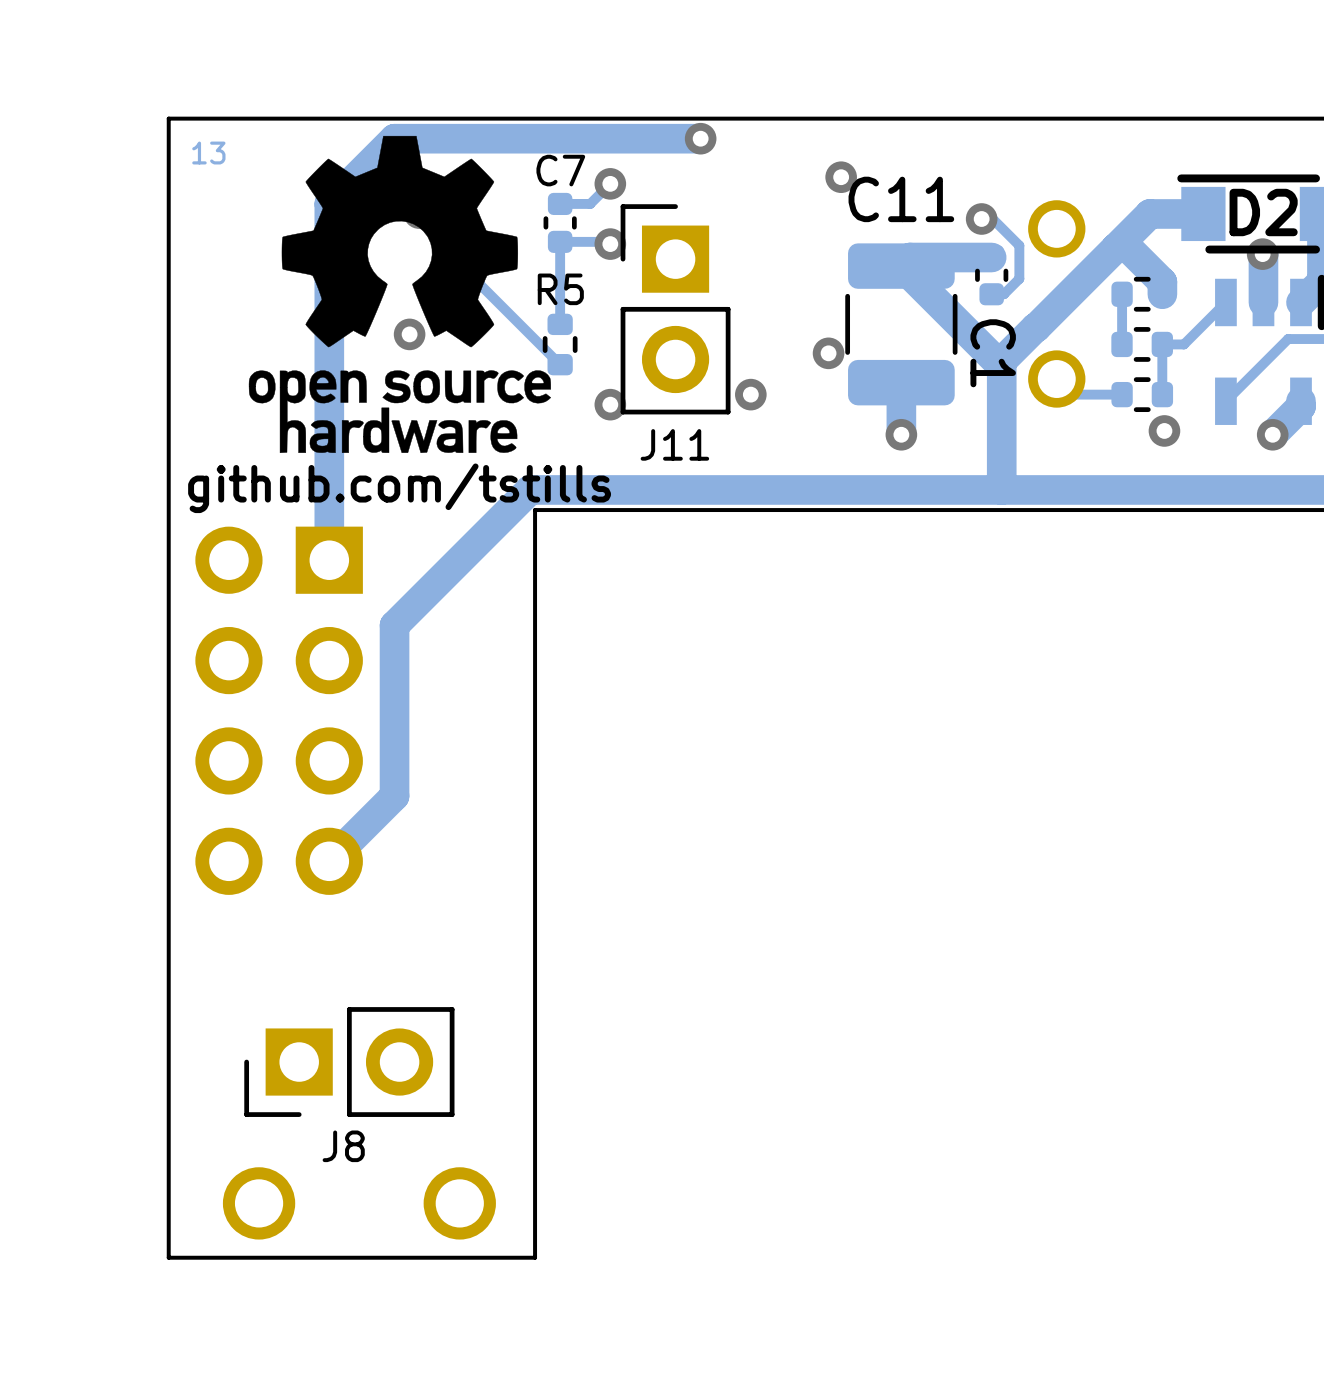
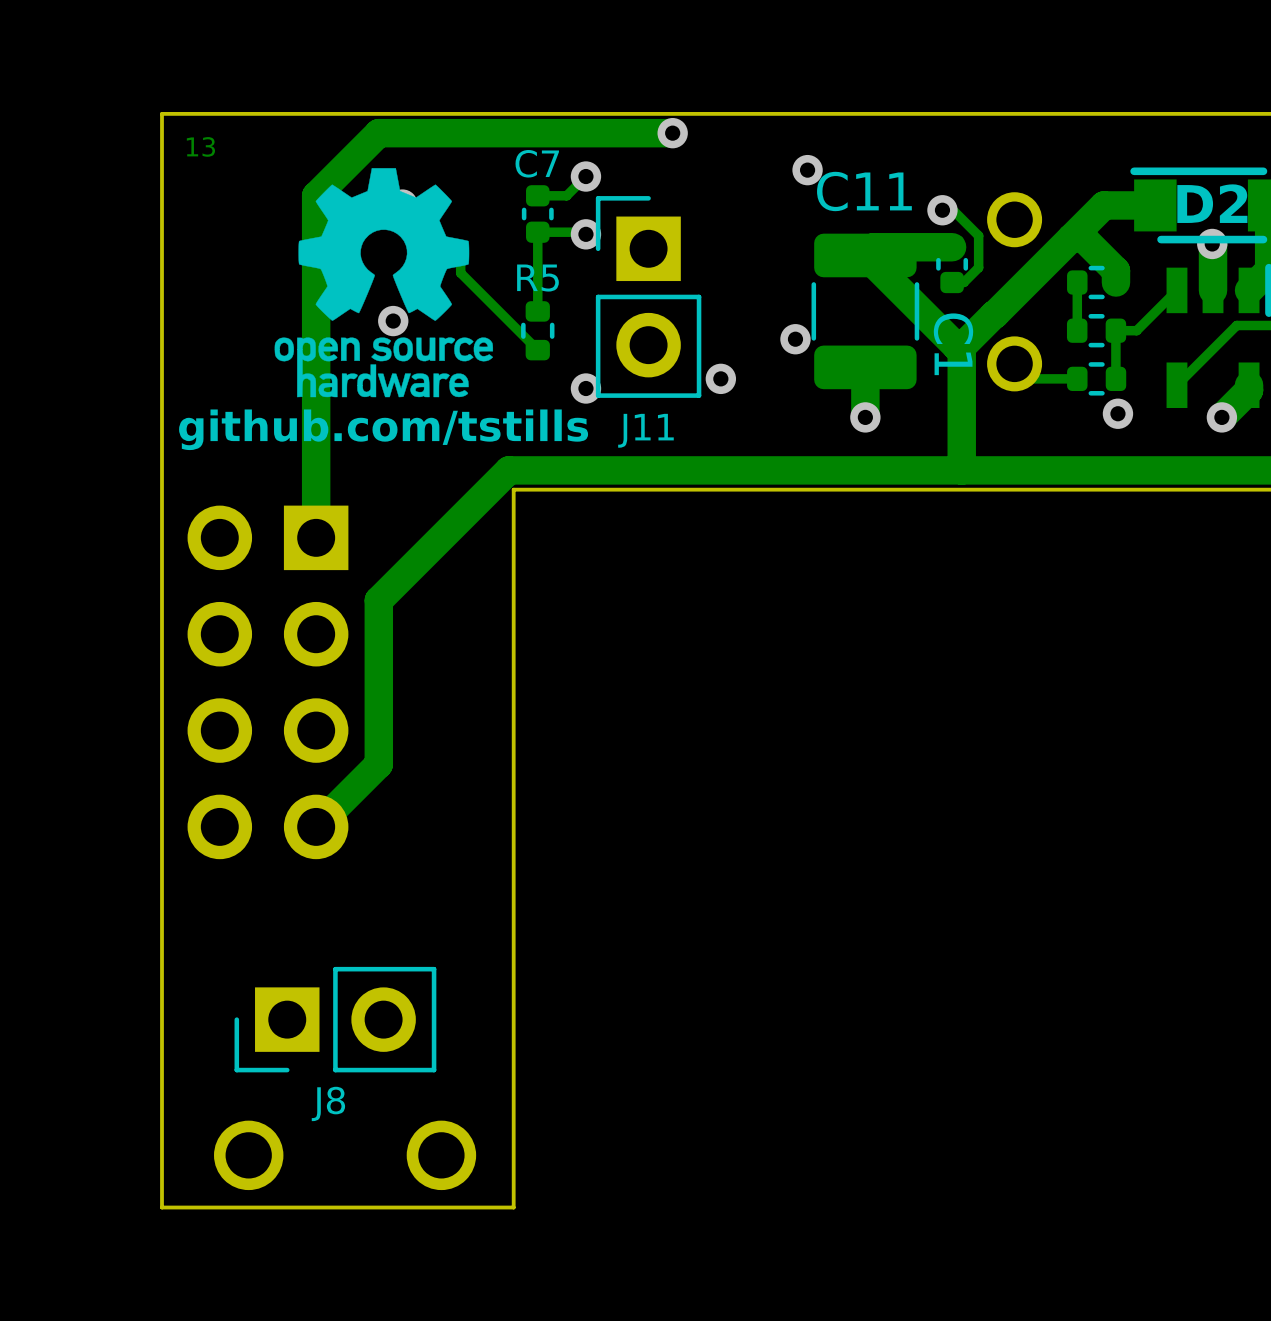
drawing shape: [248, 135, 552, 453] -> [274, 168, 494, 398]
text position: github.com/tstills (399, 488) -> github.com/tstills (383, 429)

